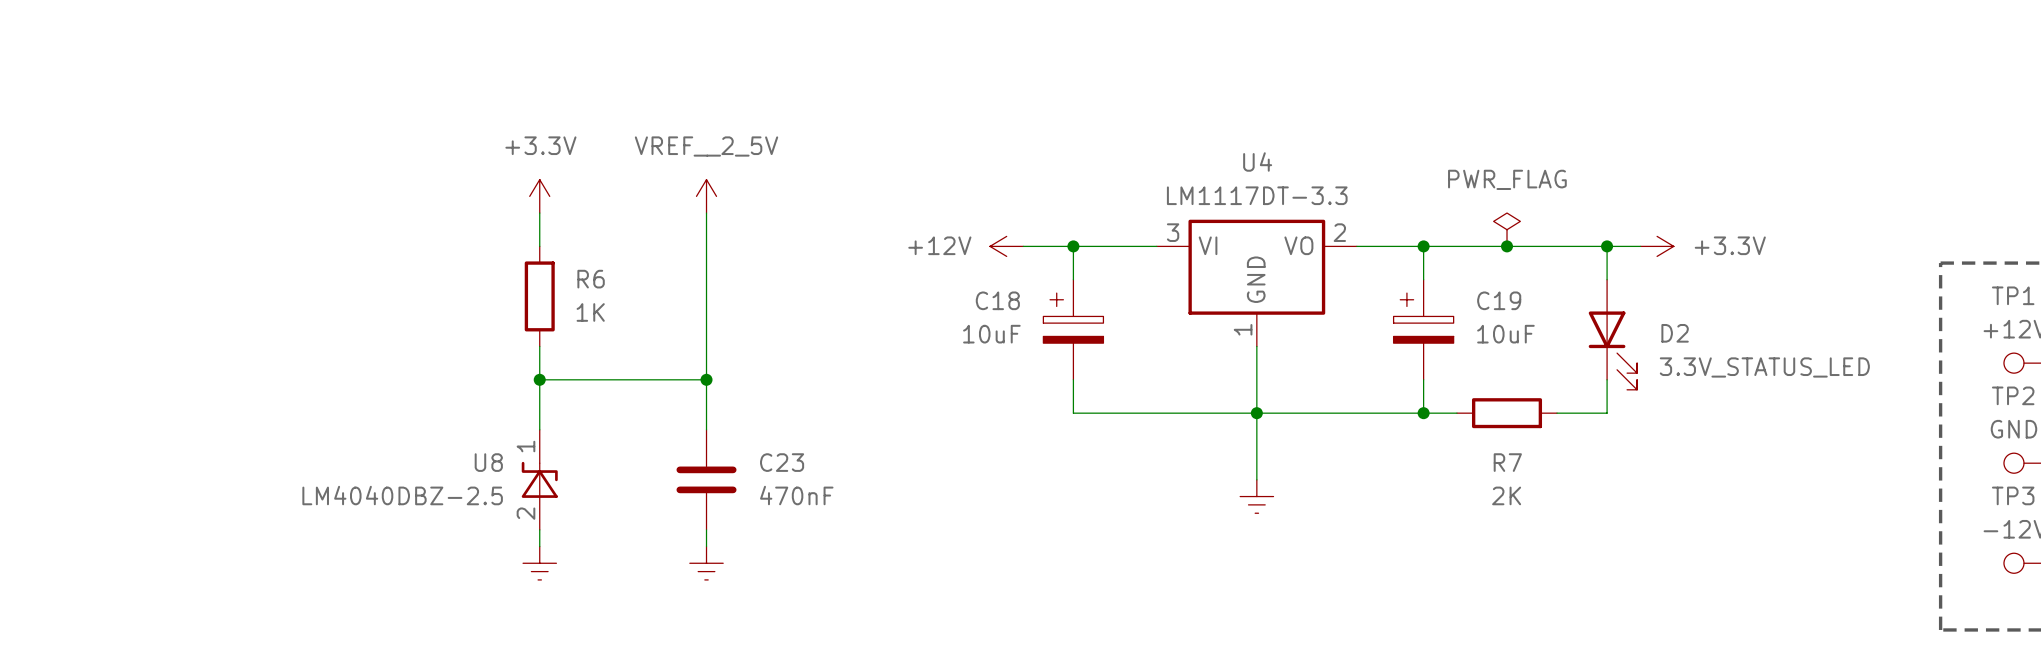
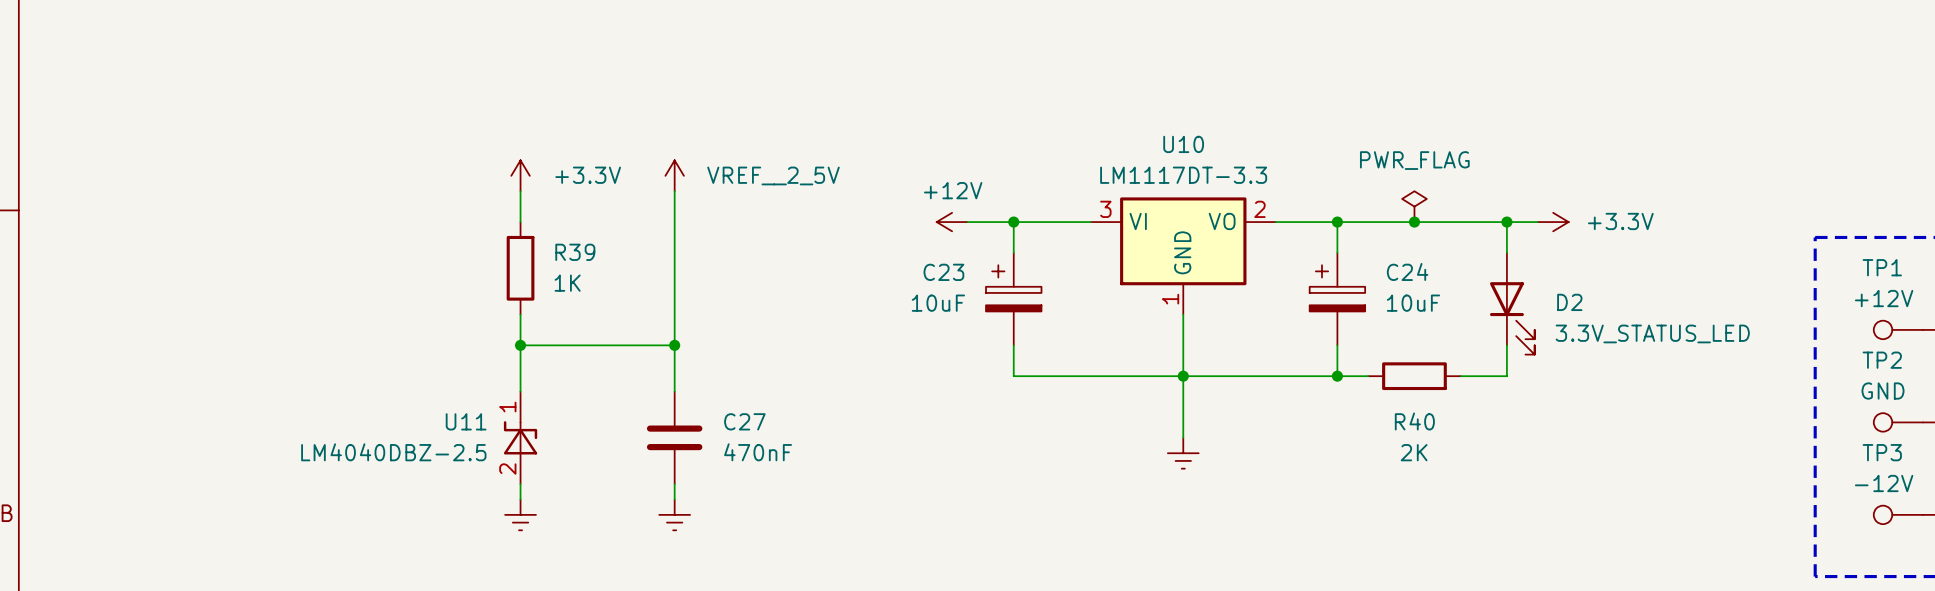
power symbol text position: +3.3V (540, 145) -> +3.3V (588, 175)
power symbol text position: VREF__2_5V (706, 146) -> VREF__2_5V (773, 175)
U4 name: U4 (1257, 161) -> U10 (1183, 144)
power symbol text position: +12V (939, 245) -> +12V (953, 190)
R6 name: R6 (591, 279) -> R39 (575, 252)
C18 name: C18 (997, 300) -> C23 (943, 272)
C19 name: C19 (1499, 300) -> C24 (1407, 271)
U8 name: U8 (488, 462) -> U11 (466, 421)
C23 name: C23 (782, 462) -> C27 (744, 421)
R7 name: R7 (1507, 462) -> R40 (1414, 421)

